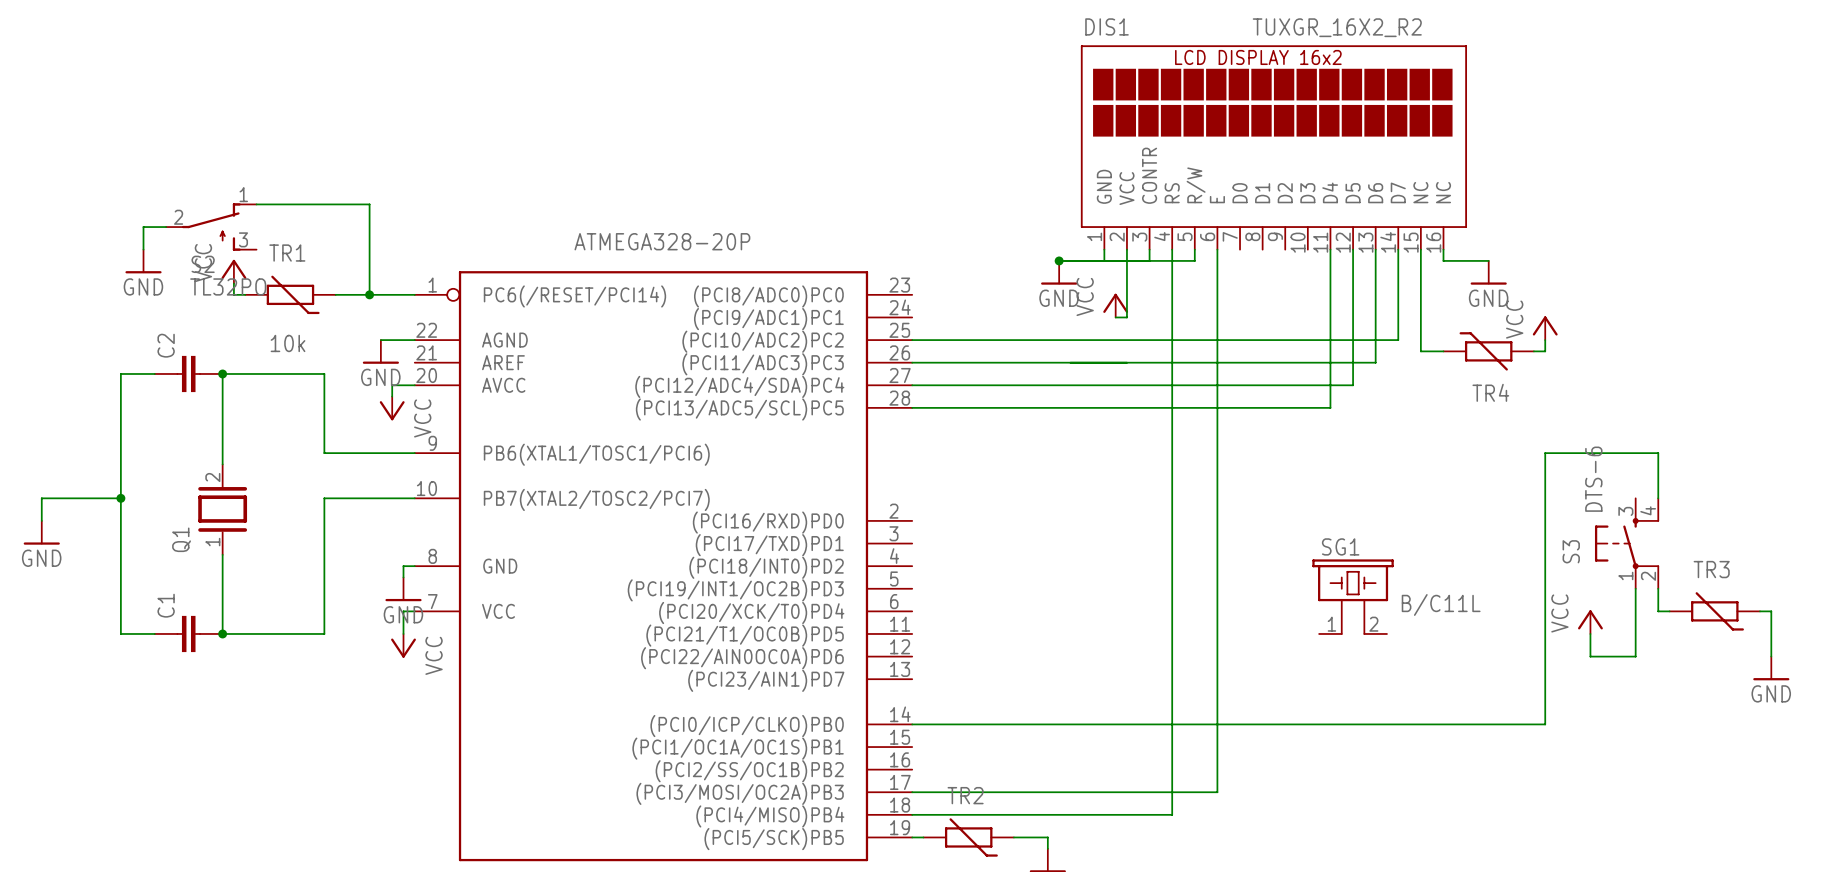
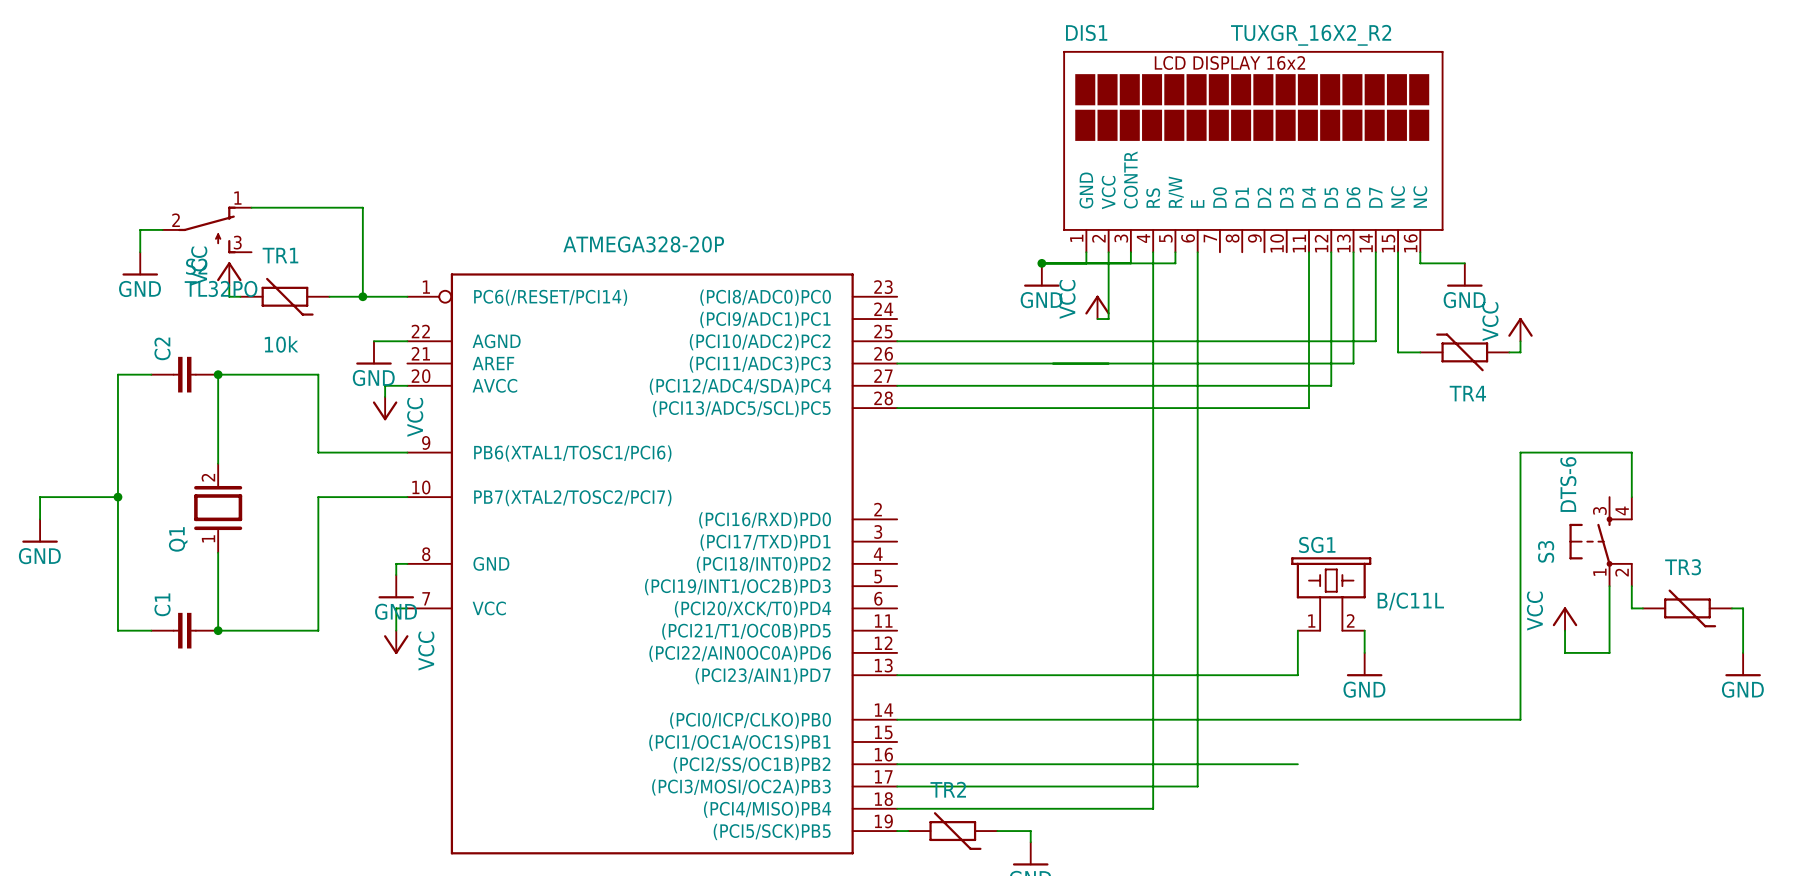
wire: none -> (1297, 630) (1297, 675) (897, 675)
wire: none -> (1364, 630) (1364, 652)
power symbol: none -> GND (1364, 664)
wire: none -> (897, 764) (1297, 764)

